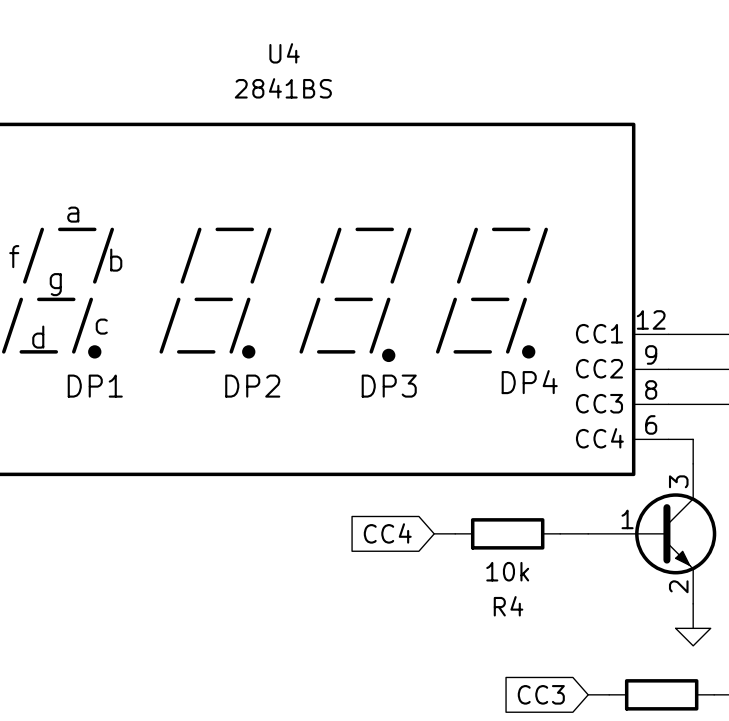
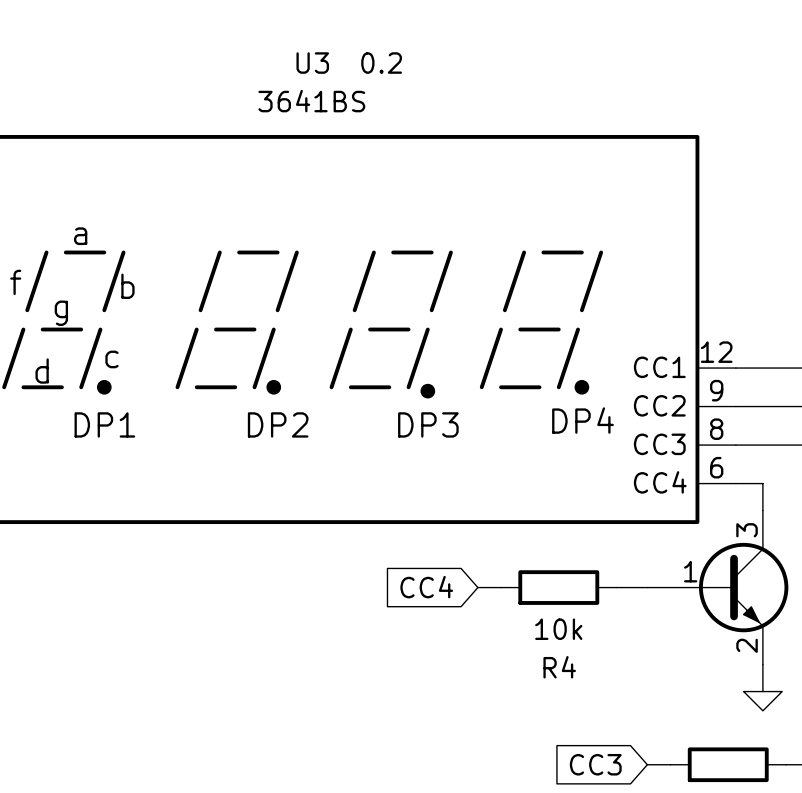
U4 name: U4 (284, 53) -> U3 (312, 63)
U4 text: none -> 0.2 (381, 63)
U4 value: 2841BS (283, 88) -> 3641BS (311, 101)

